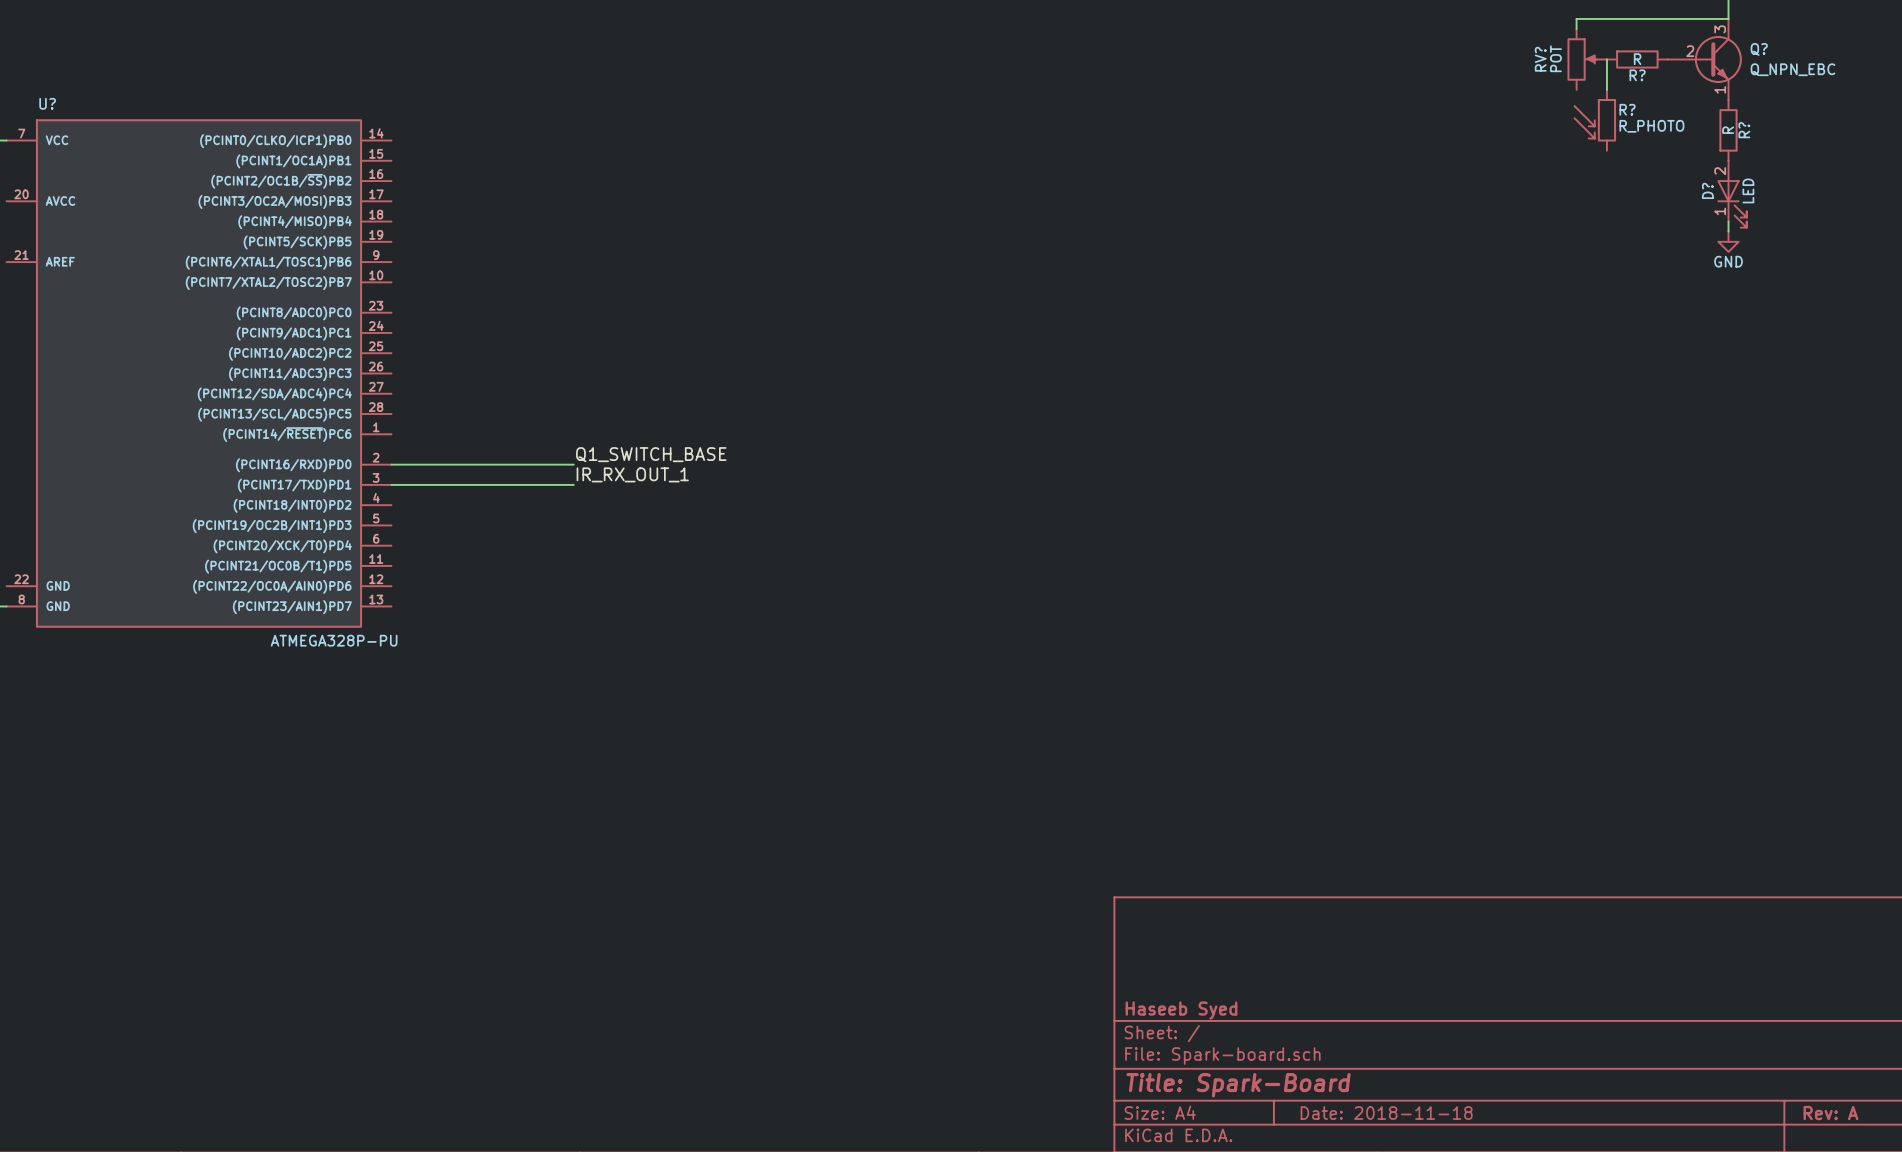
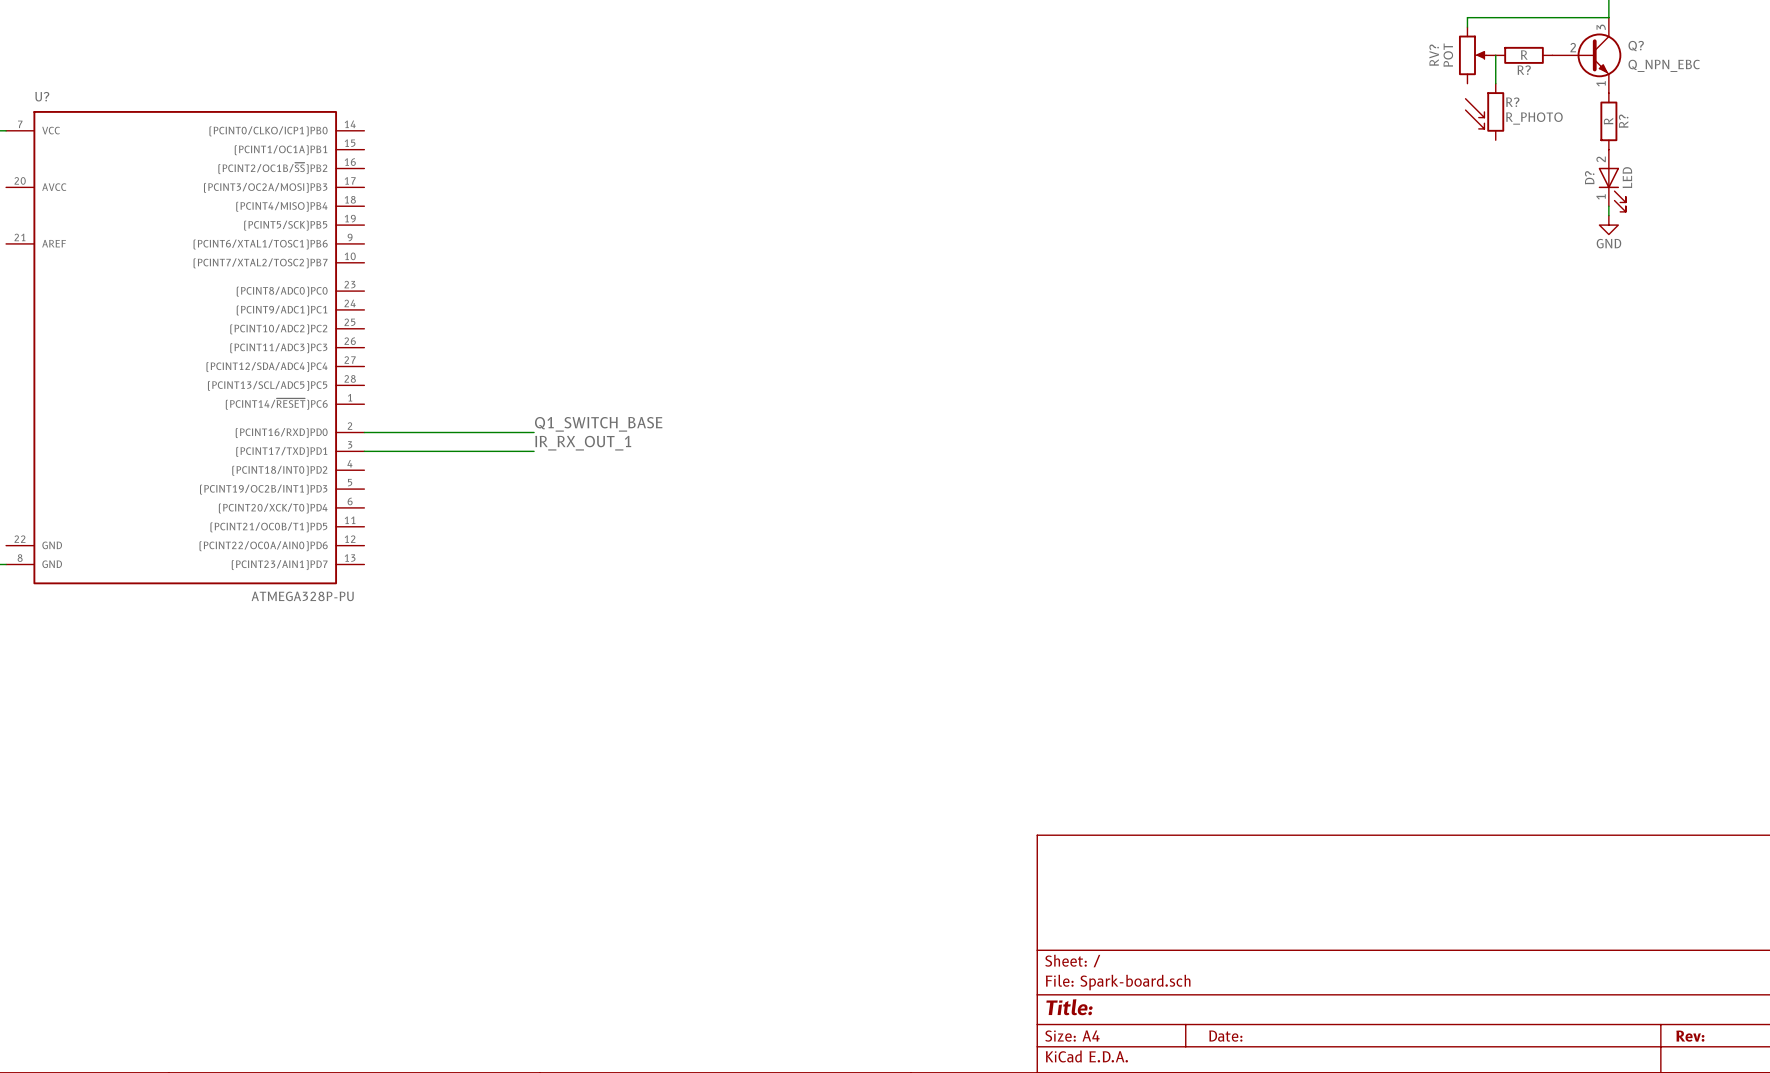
title block: Haseeb Syed (1181, 1010) -> none
title block: Title: Spark-Board (1238, 1085) -> Title: (1069, 1007)
title block: Date: 2018-11-18 (1386, 1113) -> Date: (1225, 1036)
title block: Rev: A (1830, 1113) -> Rev: (1690, 1036)

